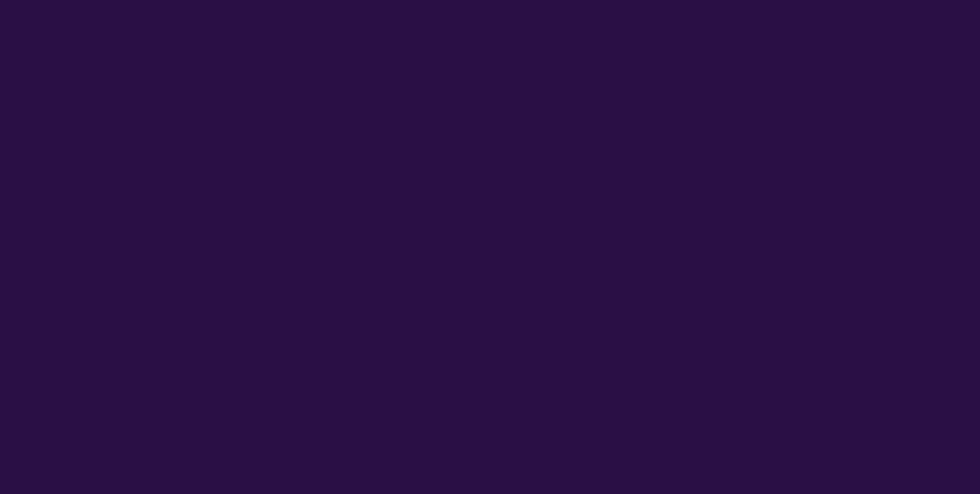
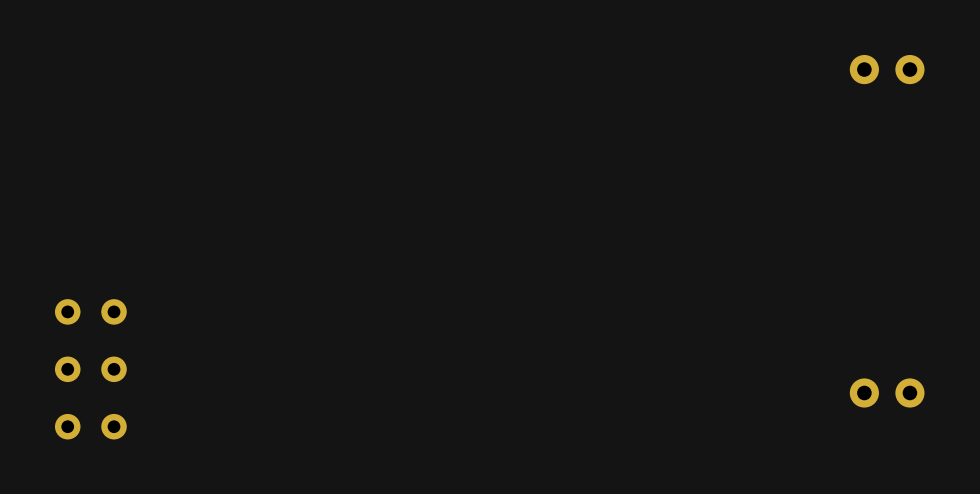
part: none -> (887, 69)
part: none -> (90, 311)
part: none -> (90, 369)
part: none -> (887, 392)
part: none -> (90, 426)

